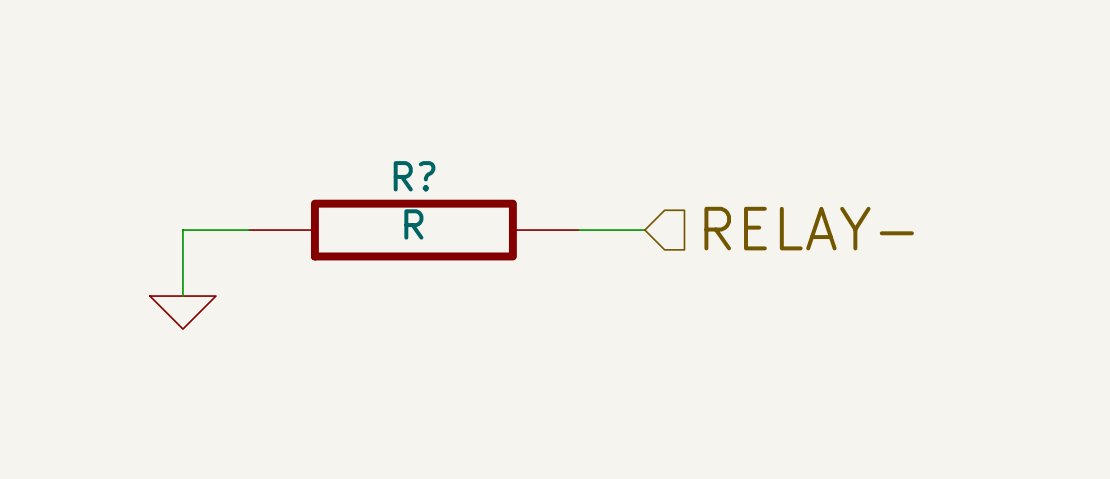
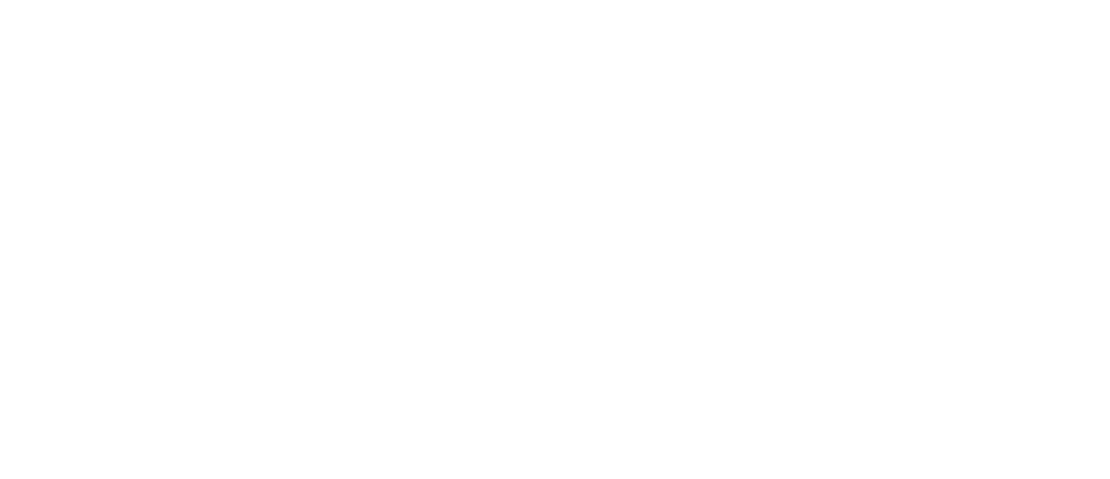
hierarchical label: RELAY- (809, 228) -> none
wire: (248, 230) (182, 230) (182, 296) -> none
R?: R (413, 230) -> none
wire: (578, 230) (644, 230) -> none
power symbol: (182, 312) -> none

